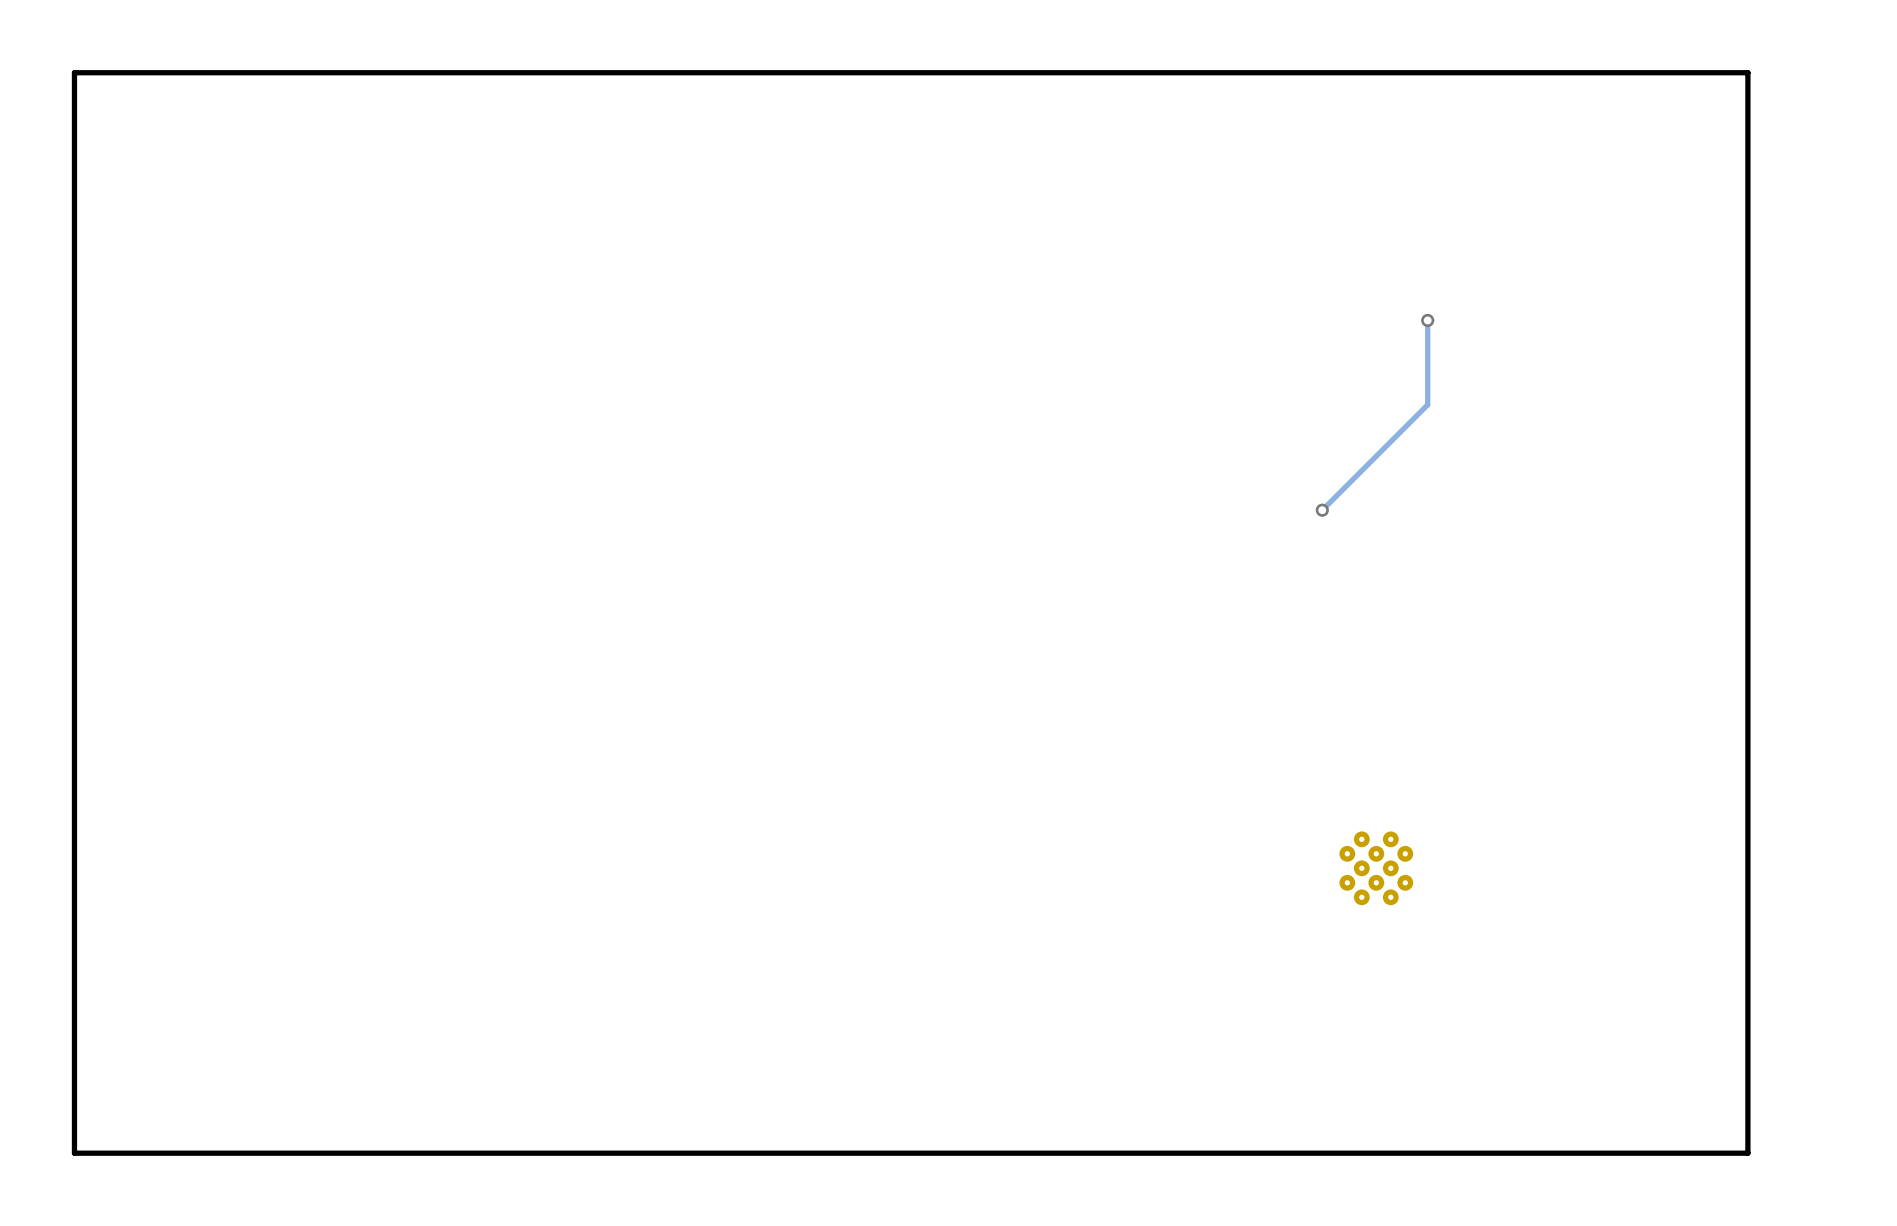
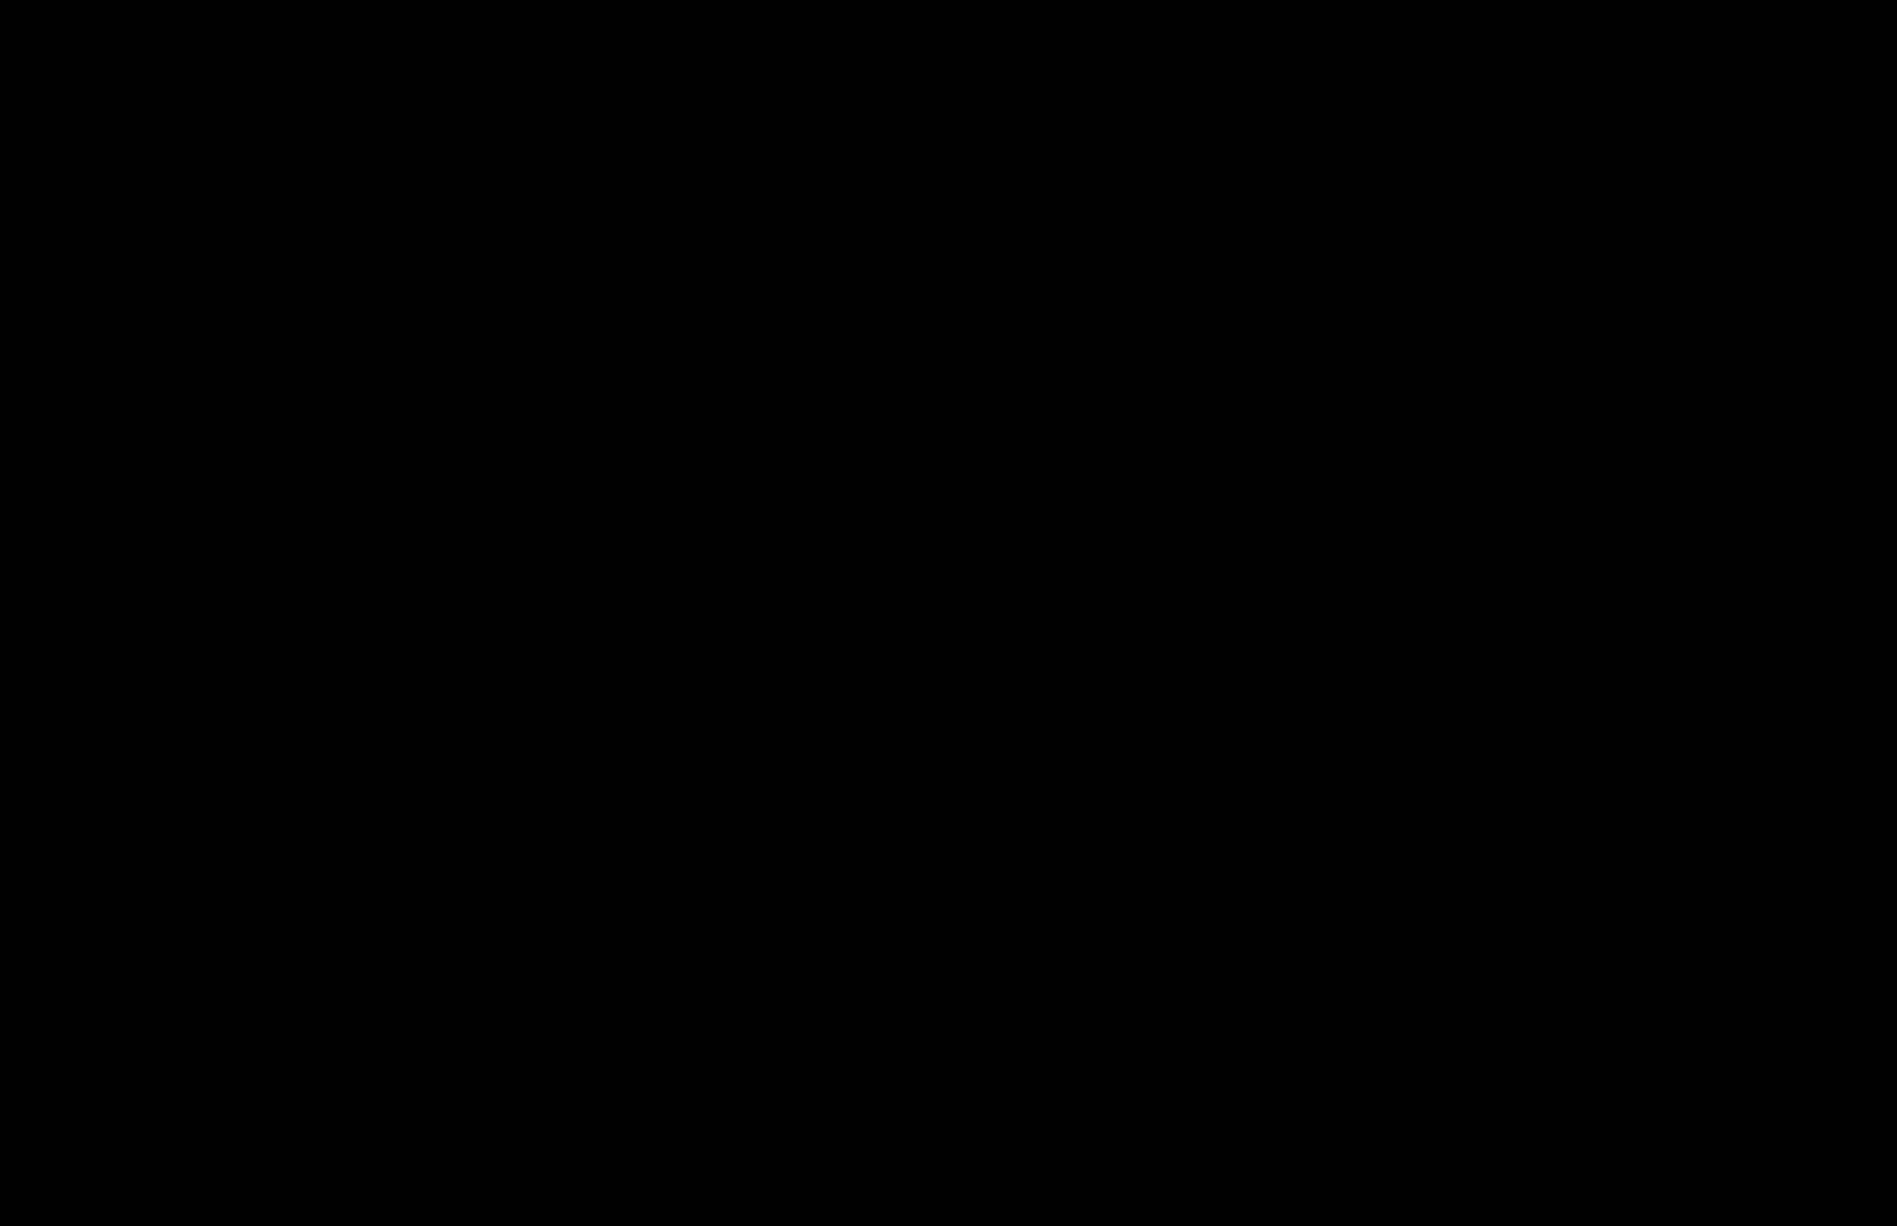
board edge: (1747, 72) (74, 72) (74, 1153) (1747, 1153) (1747, 72) -> none
track: (1427, 320) (1427, 404) (1322, 510) -> none
via: (1427, 320) -> none
via: (1322, 510) -> none
part: (1376, 868) -> none

